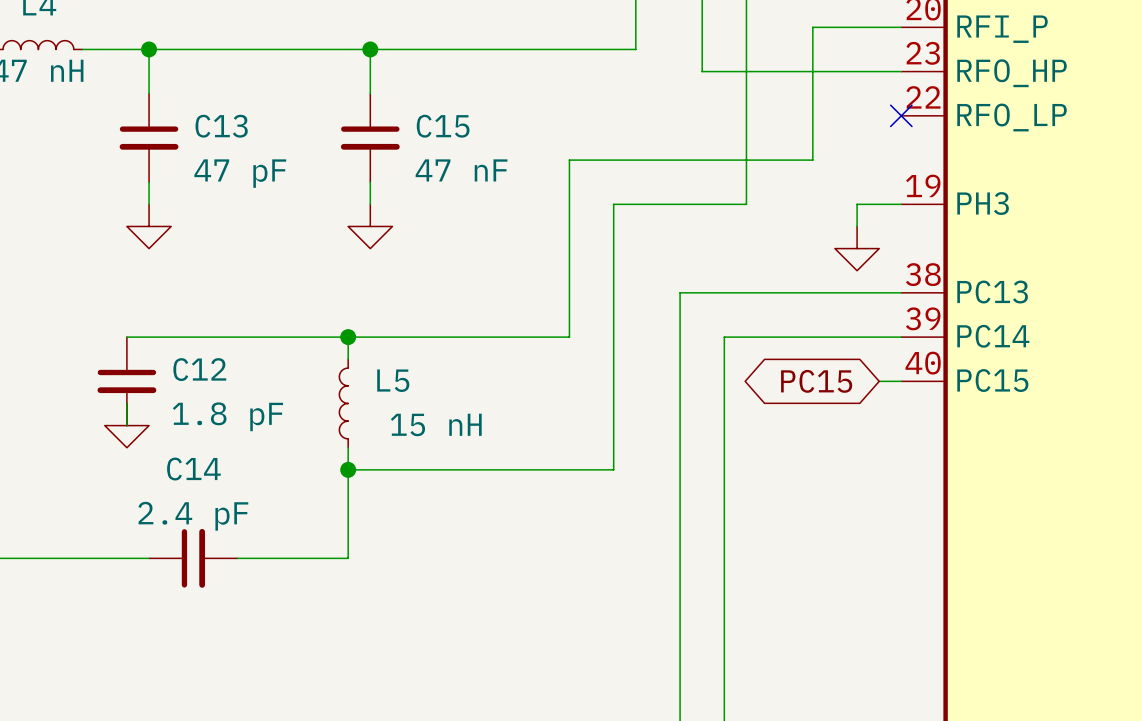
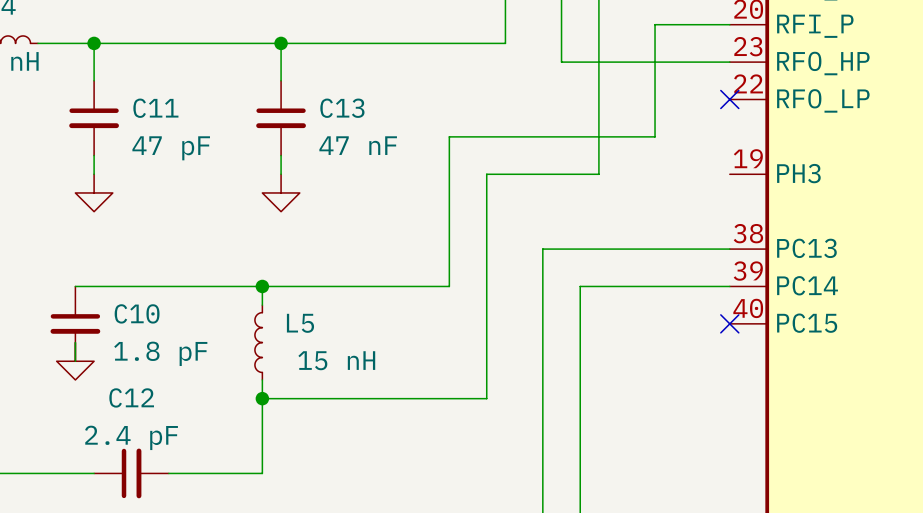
C13 name: C13 (221, 126) -> C11 (155, 108)
C15 name: C15 (443, 126) -> C13 (342, 108)
wire: (901, 204) (857, 204) (857, 226) -> none
power symbol: (857, 248) -> none
C12 name: C12 (199, 369) -> C10 (137, 313)
global label: PC15 (816, 381) -> none
wire: (879, 381) (901, 381) -> none
no-connect mark: none -> (729, 323)
C14 name: C14 (193, 469) -> C12 (131, 397)

